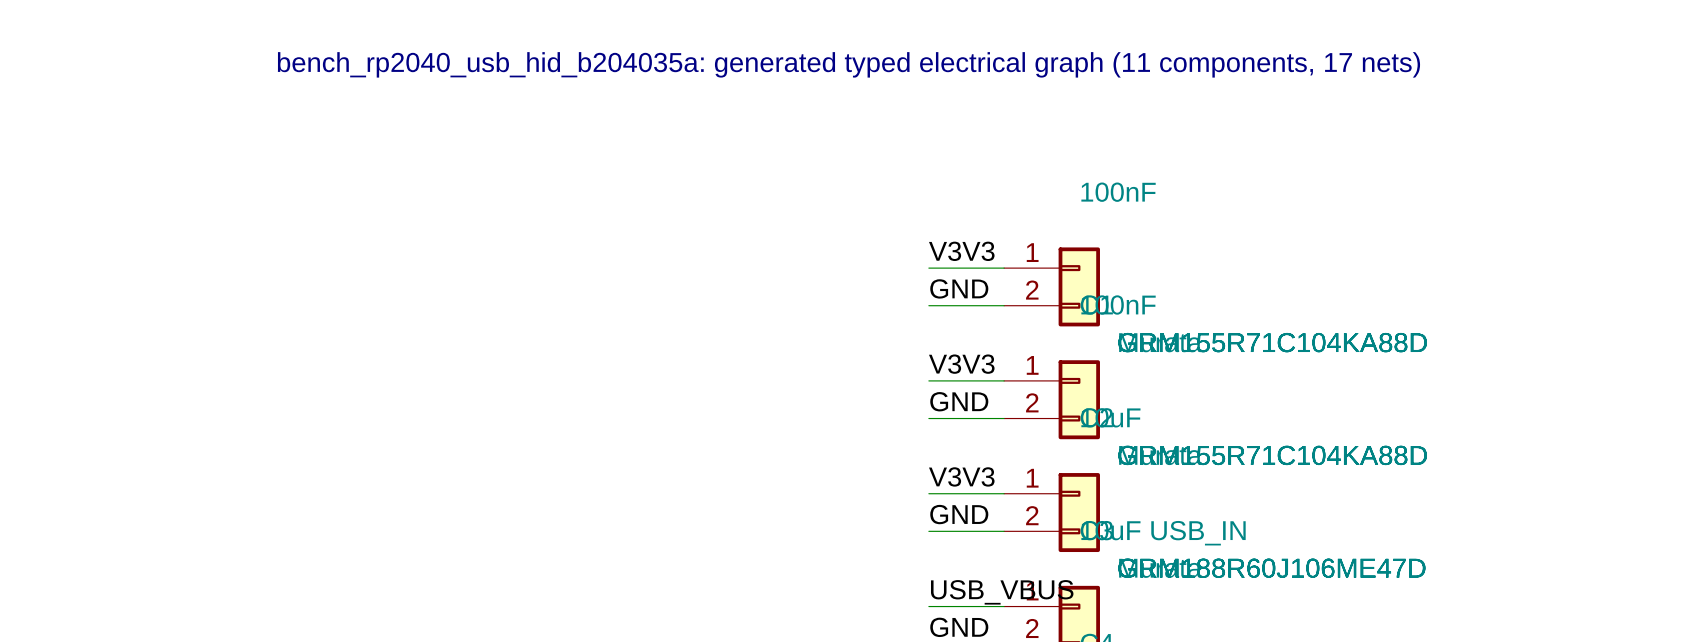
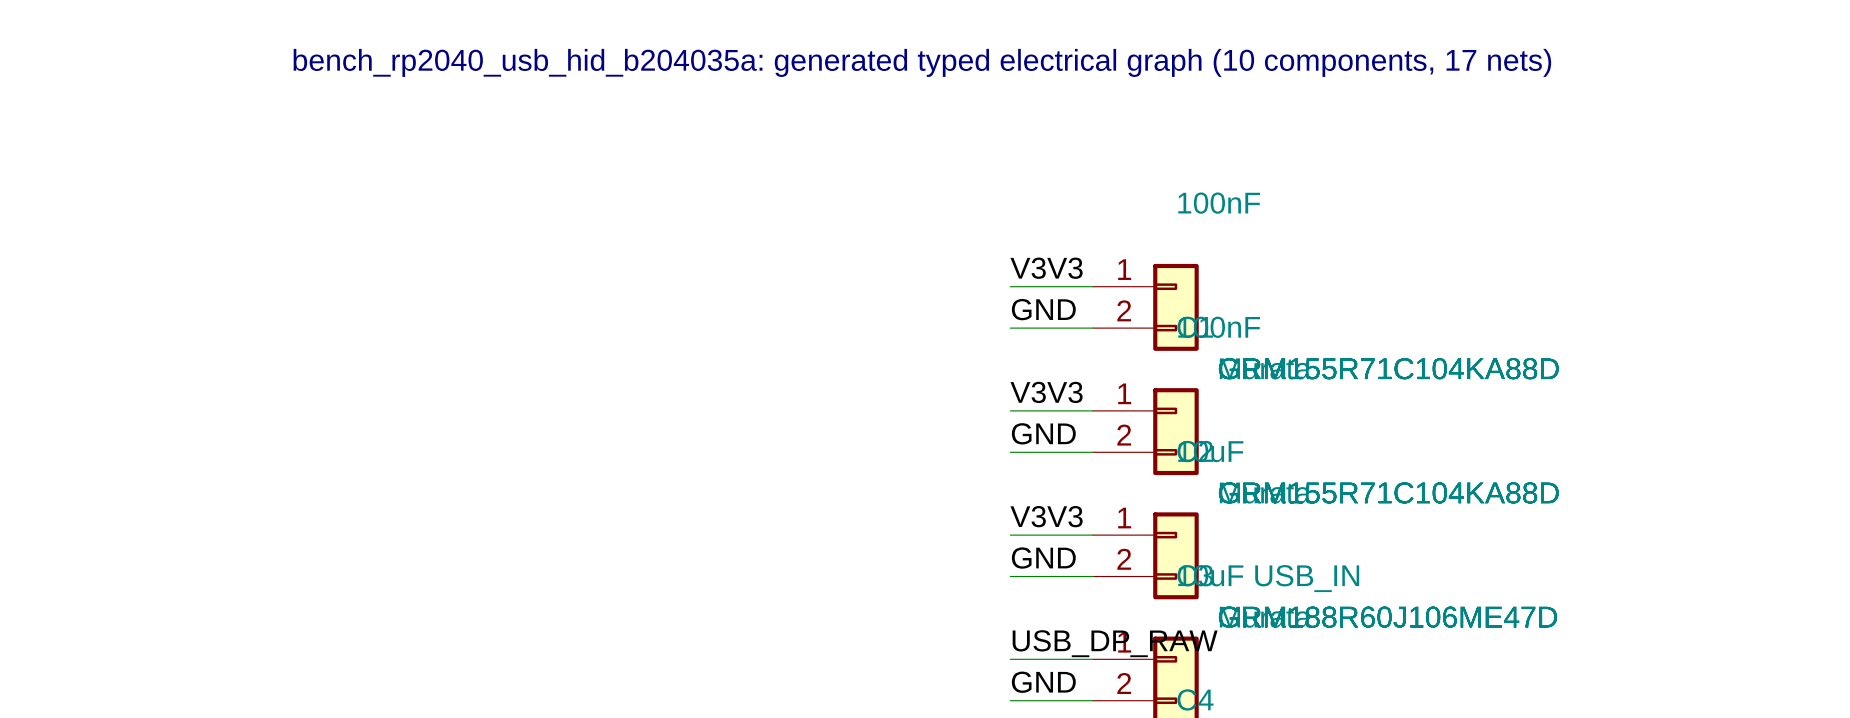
text: bench_rp2040_usb_hid_b204035a: generated typed electrical graph (11 components, 17 nets) (848, 64) -> bench_rp2040_usb_hid_b204035a: generated typed electrical graph (10 components, 17 nets) (922, 62)
label: USB_VBUS (1002, 592) -> USB_DP_RAW (1115, 643)

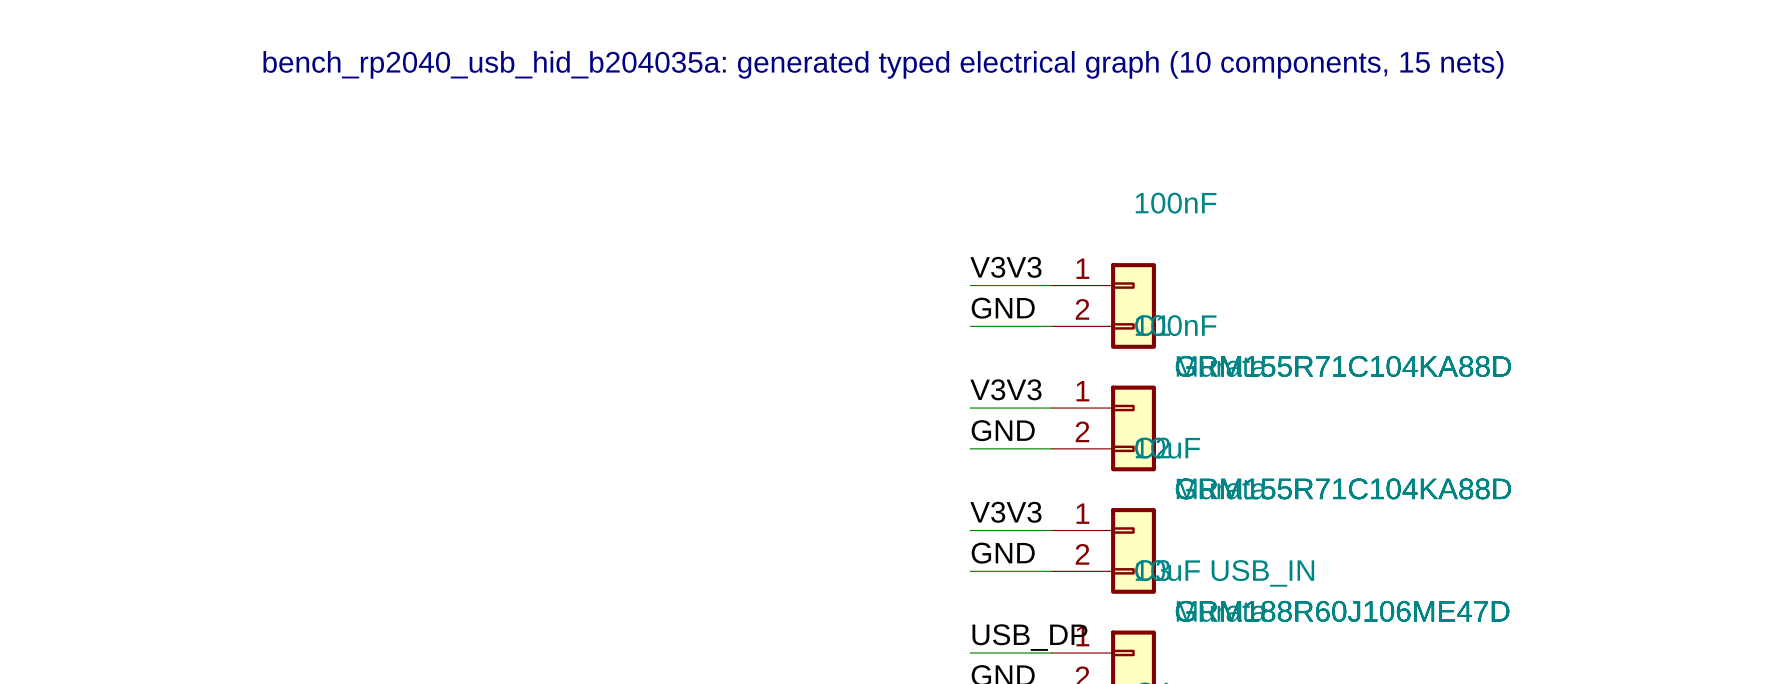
text: bench_rp2040_usb_hid_b204035a: generated typed electrical graph (10 components, 17 nets) (922, 62) -> bench_rp2040_usb_hid_b204035a: generated typed electrical graph (10 components, 15 nets) (883, 64)
label: USB_DP_RAW (1115, 643) -> USB_DP (1029, 637)

